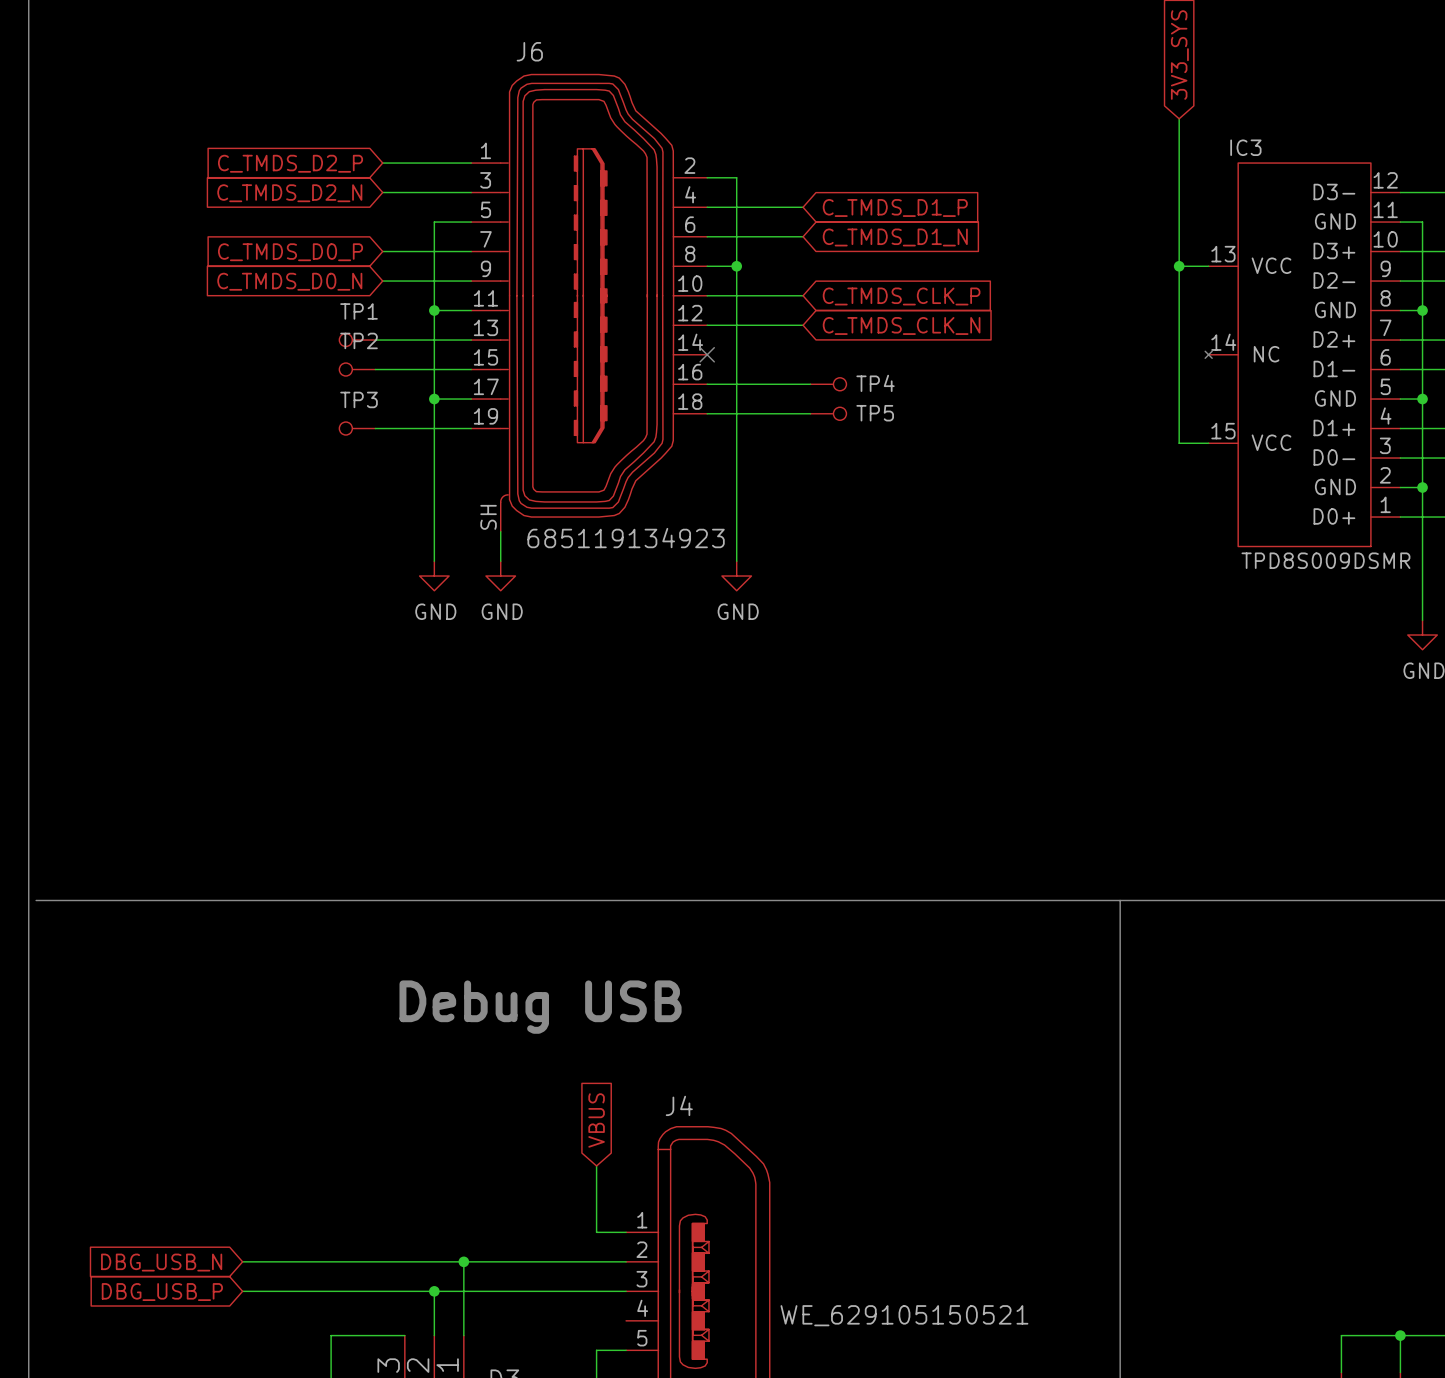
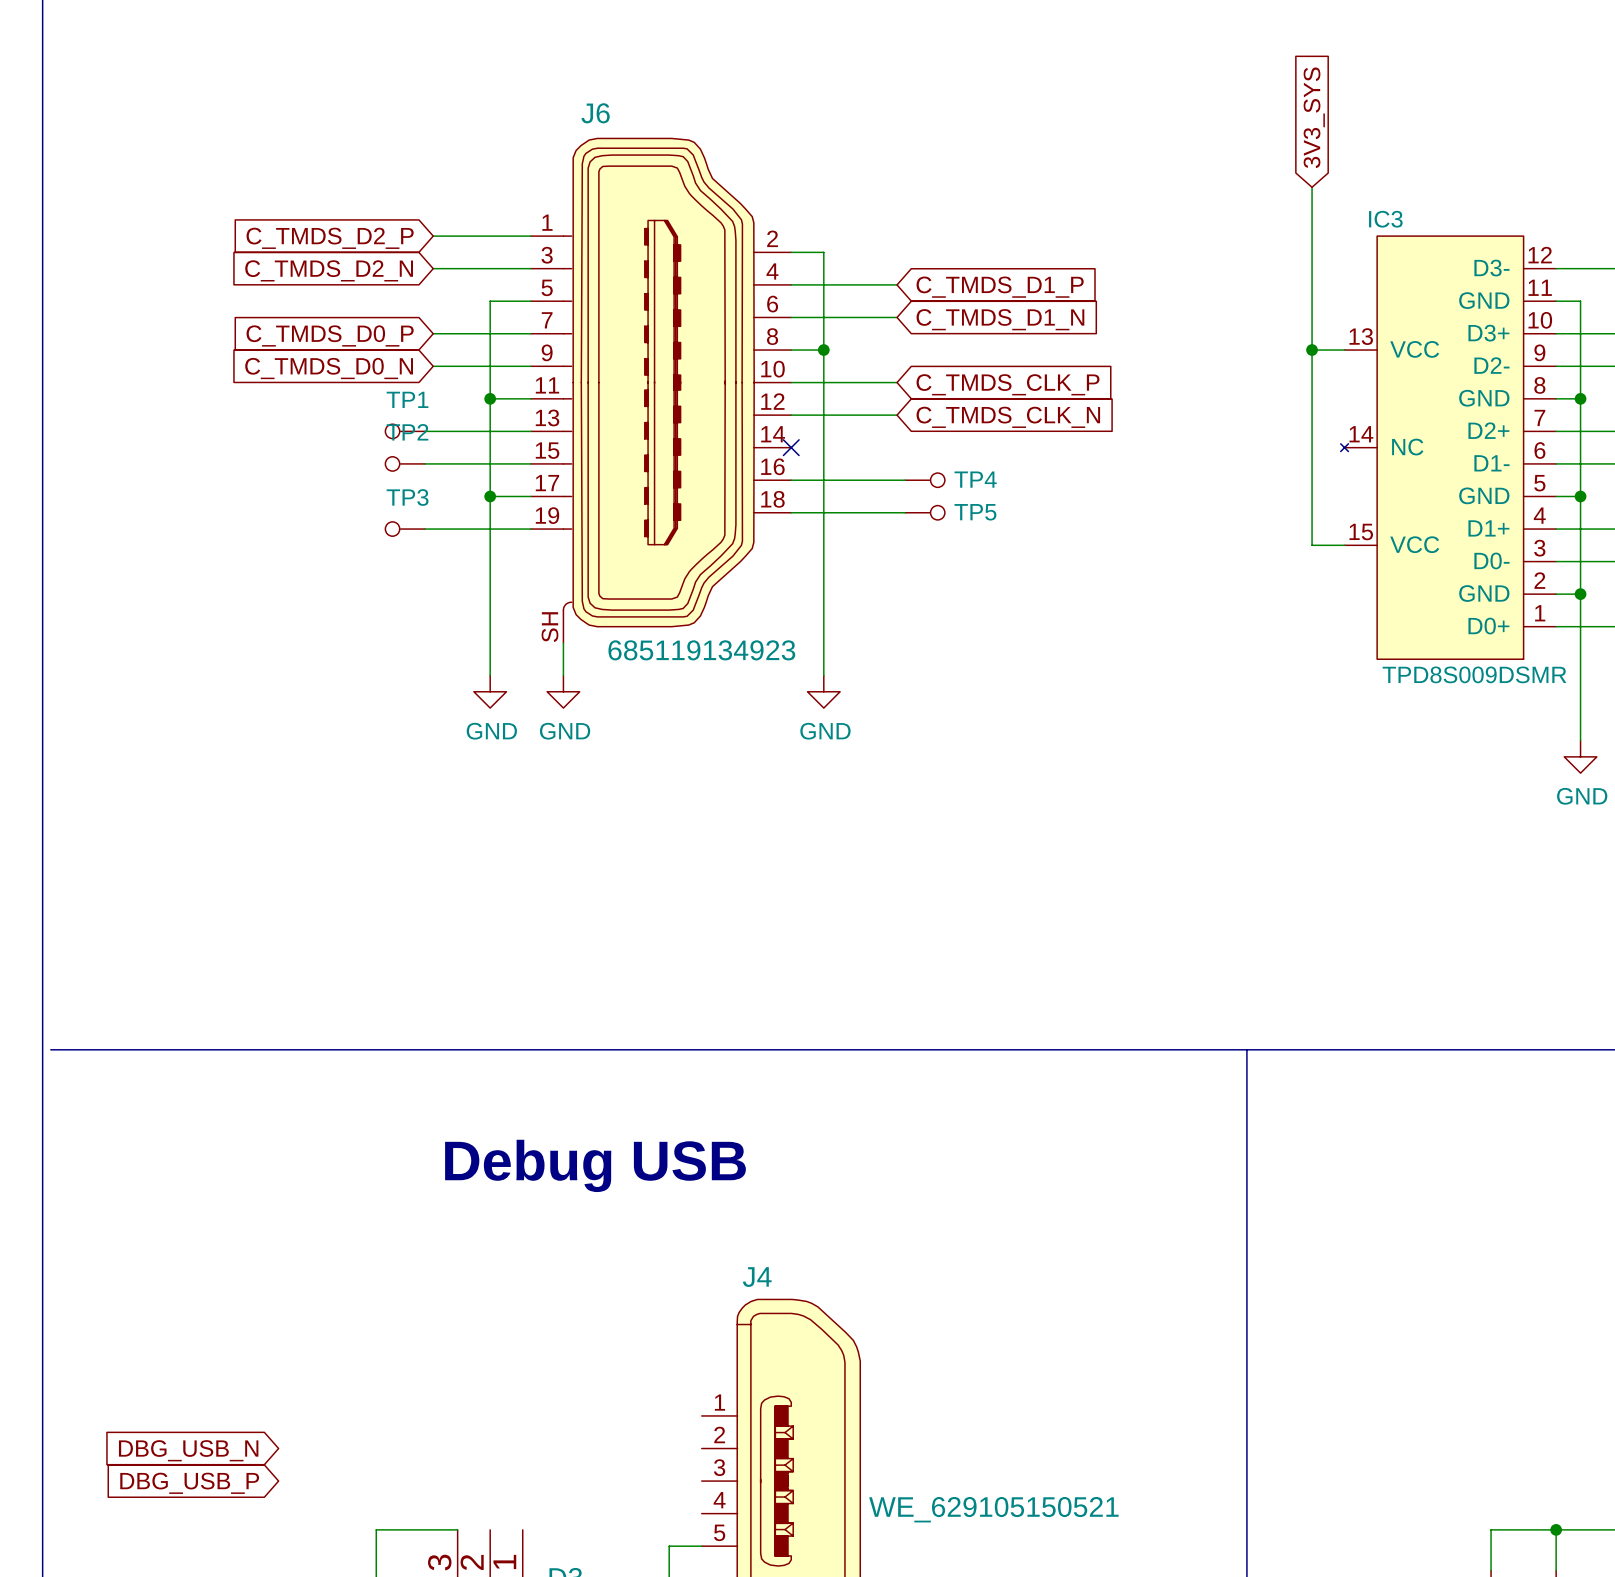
global label: VBUS (596, 1120) -> none
wire: (596, 1165) (596, 1232) (626, 1232) -> none
wire: (242, 1261) (626, 1261) -> none
wire: (463, 1261) (463, 1335) -> none
junction: (463, 1261) -> none
wire: (242, 1291) (626, 1291) -> none
wire: (434, 1291) (434, 1335) -> none
junction: (434, 1291) -> none

